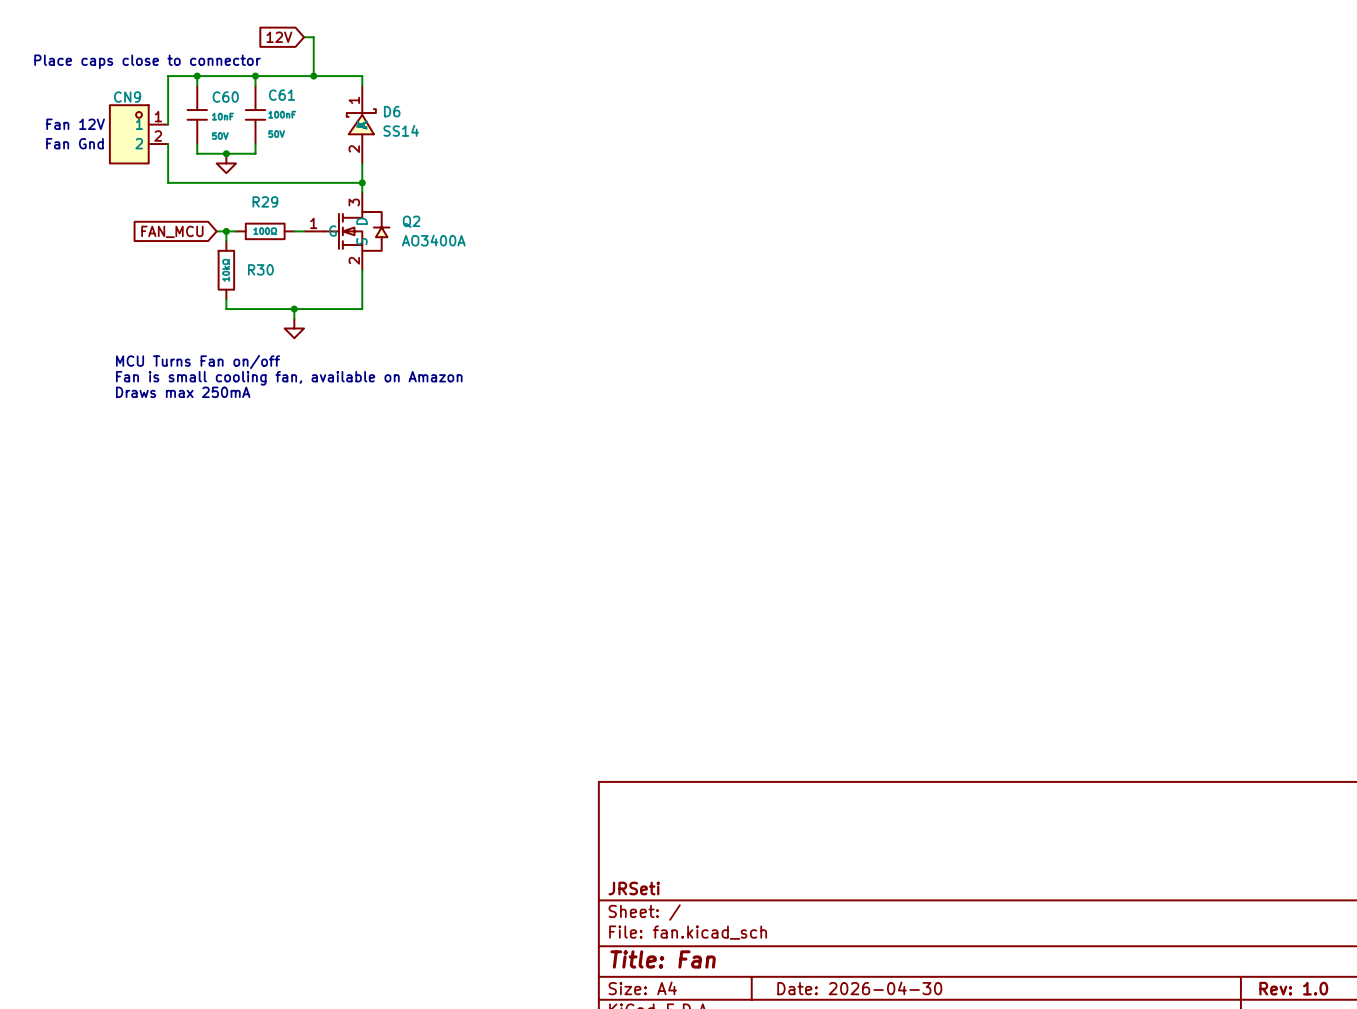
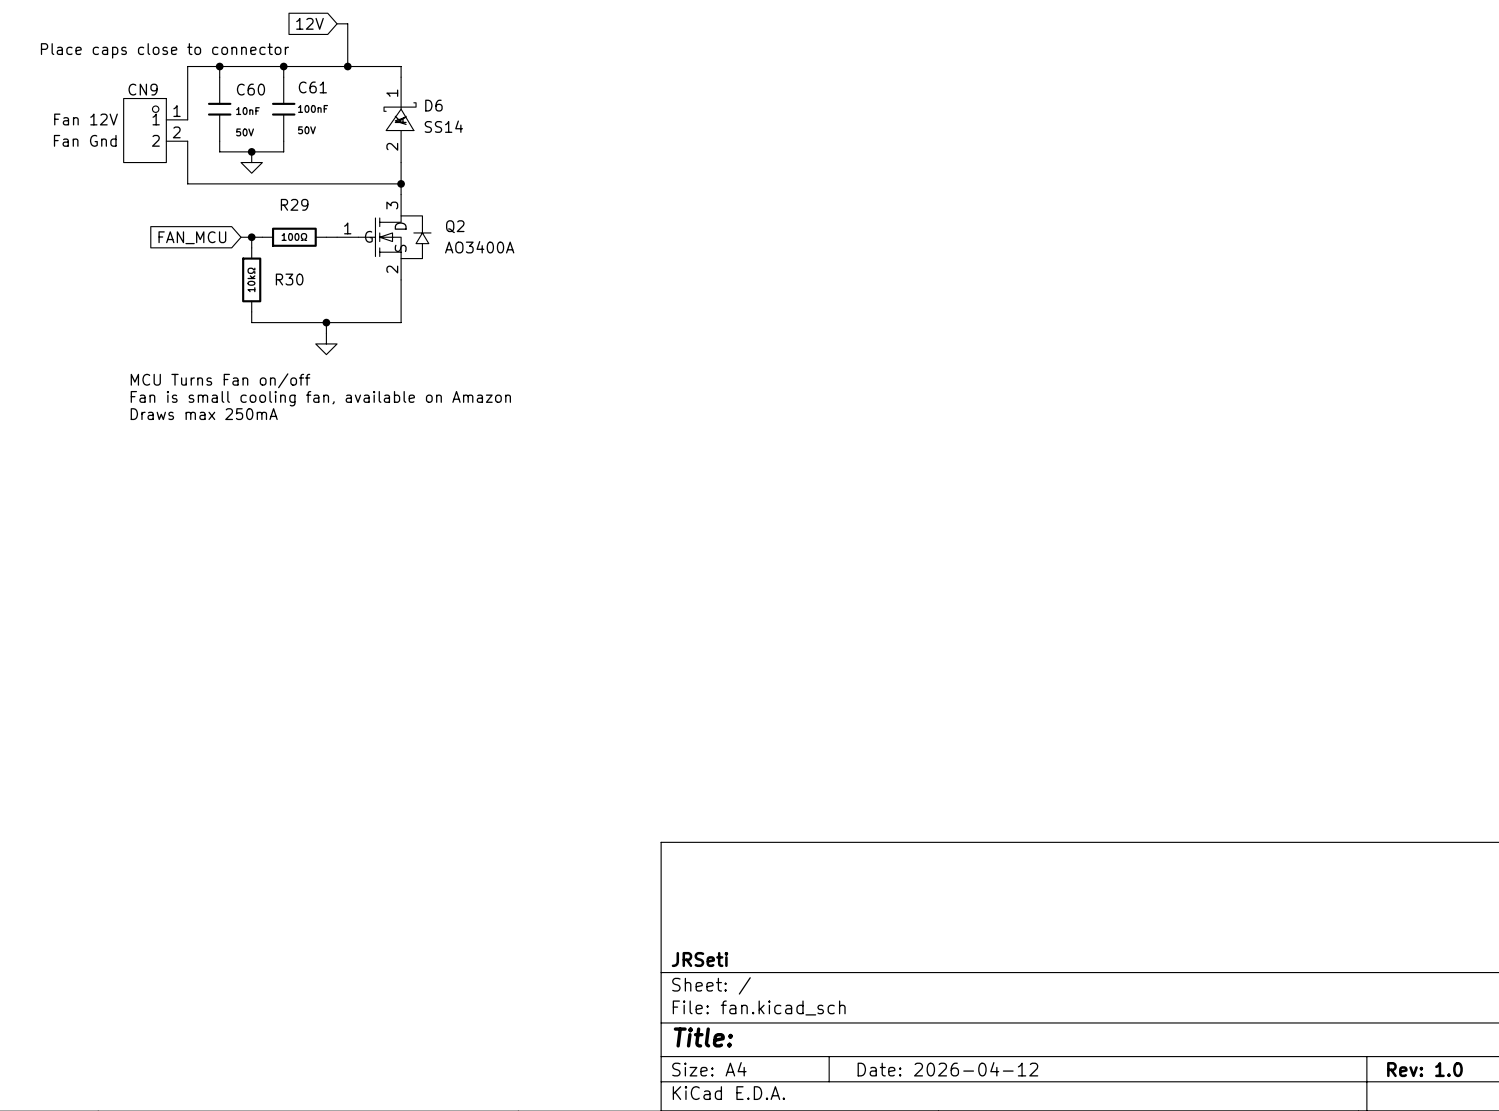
title block: Title: Fan (663, 959) -> Title: (703, 1037)
title block: Date: 2026-04-30 (859, 988) -> Date: 2026-04-12 (947, 1069)

